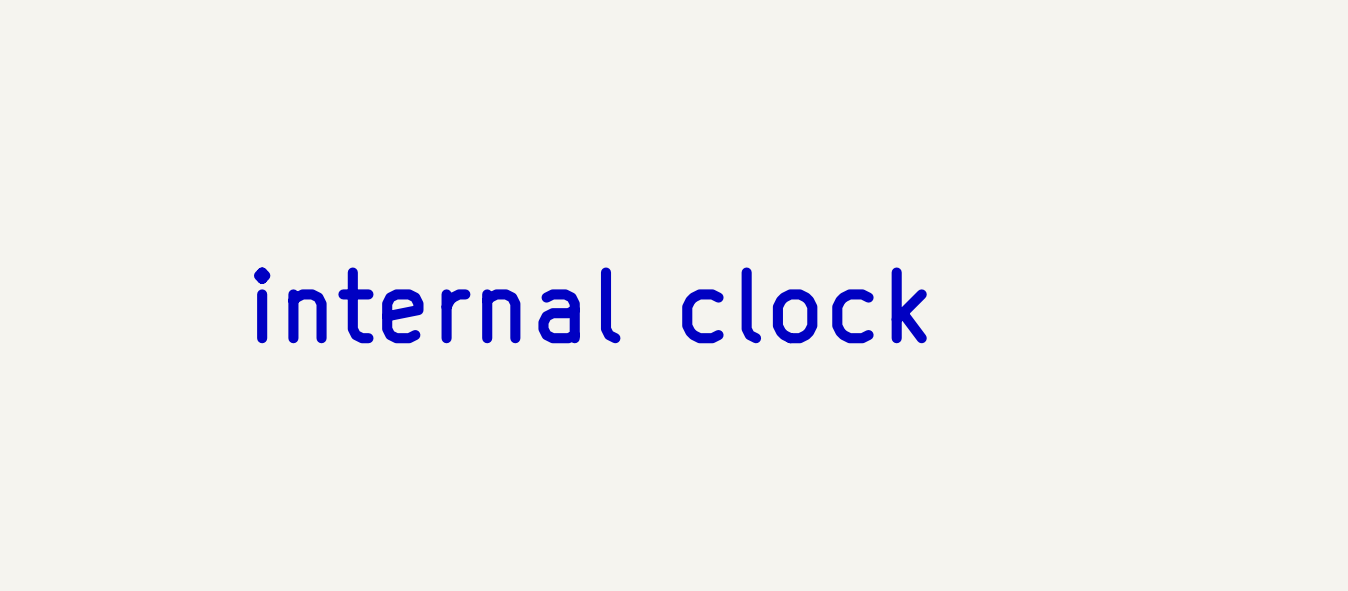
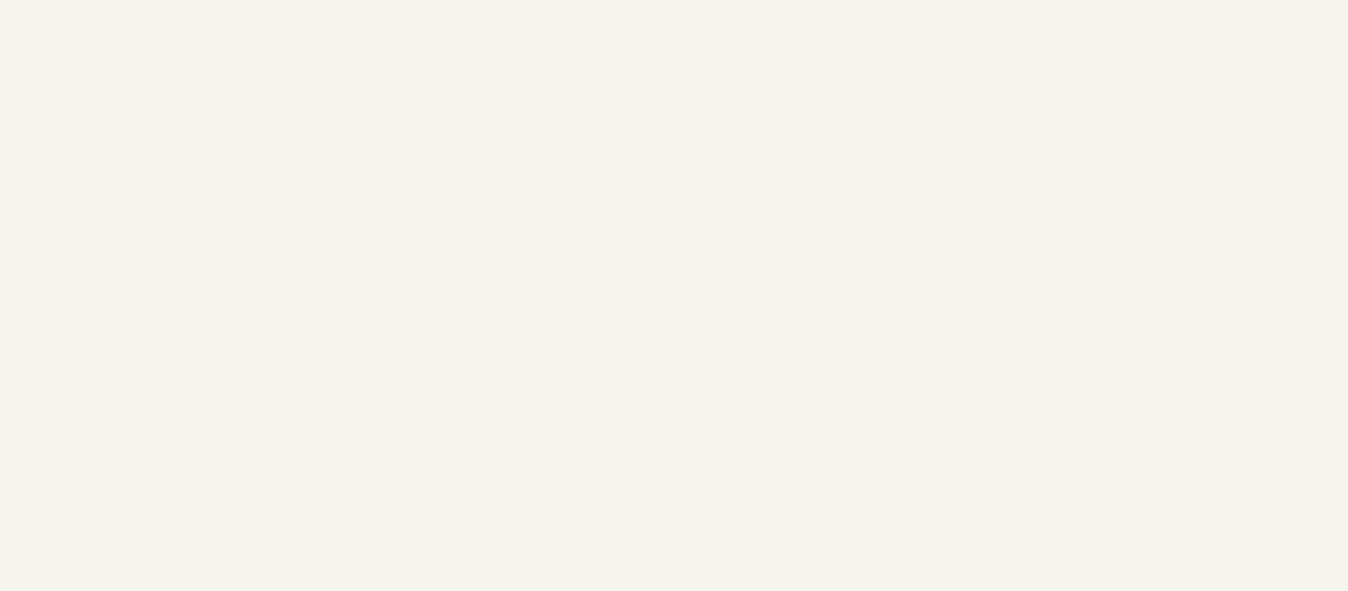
text: internal clock (590, 305) -> none

